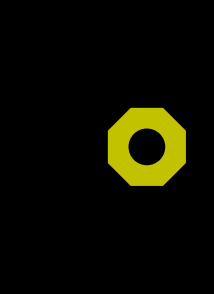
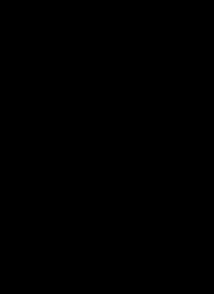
part: (146, 146) -> none

